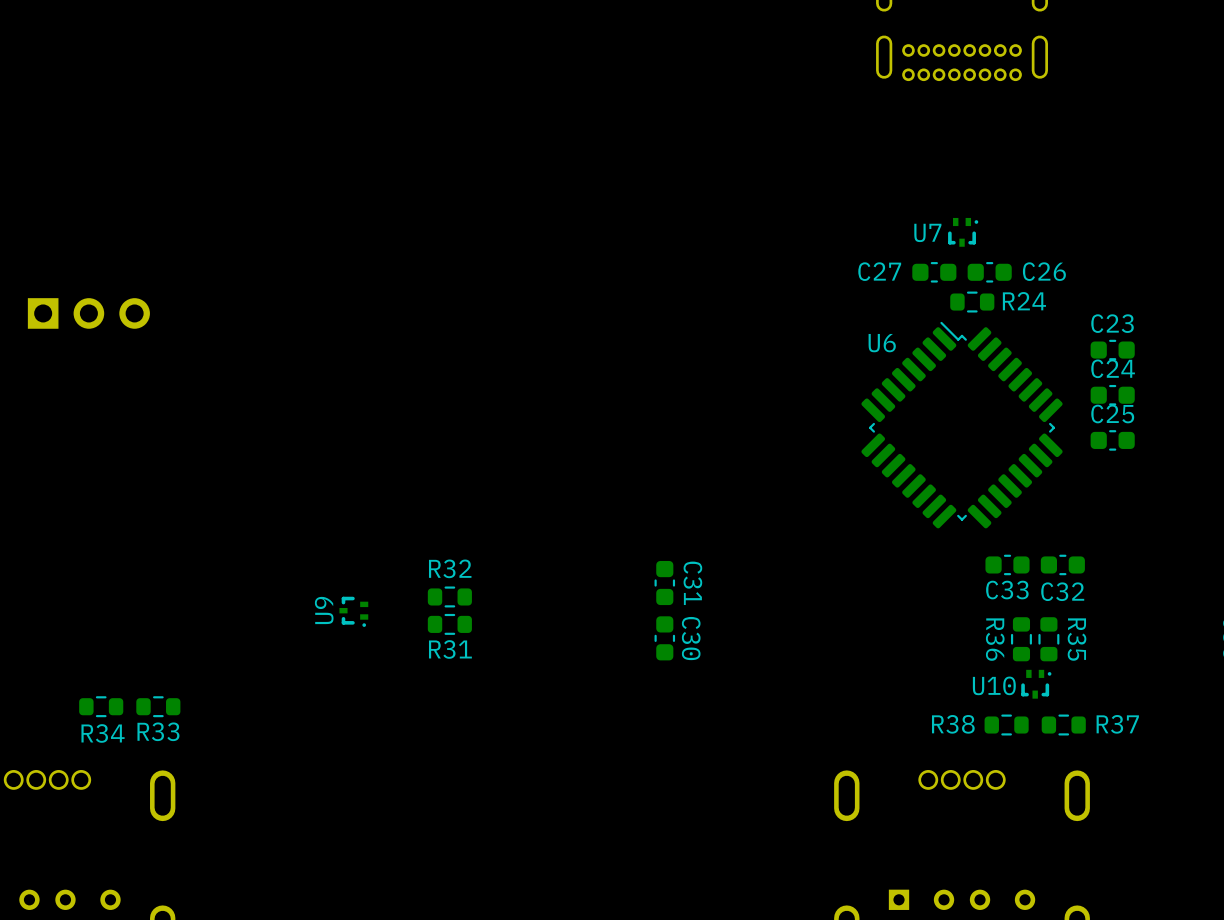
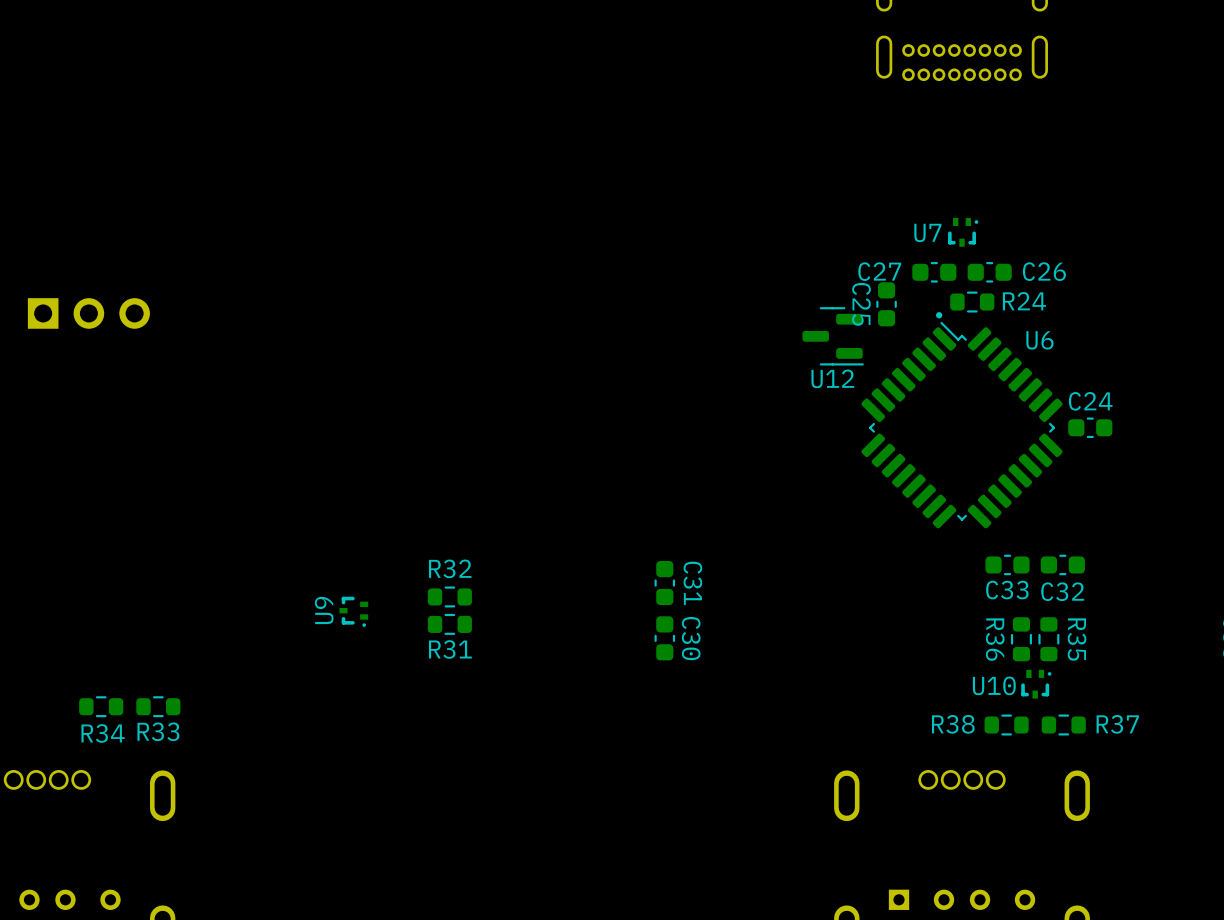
drawing: none -> [936, 312, 943, 319]
U12: none -> (833, 336)
U6 name position: U6 (882, 343) -> U6 (1039, 340)
C23: (1112, 350) -> none
C24 position: (1112, 395) -> (1090, 427)
C25 name position: C25 (1112, 414) -> C25 (861, 304)
C25 rotation: 0° (1112, 440) -> 90° clockwise (886, 304)
C25 position: (1112, 440) -> (886, 304)

